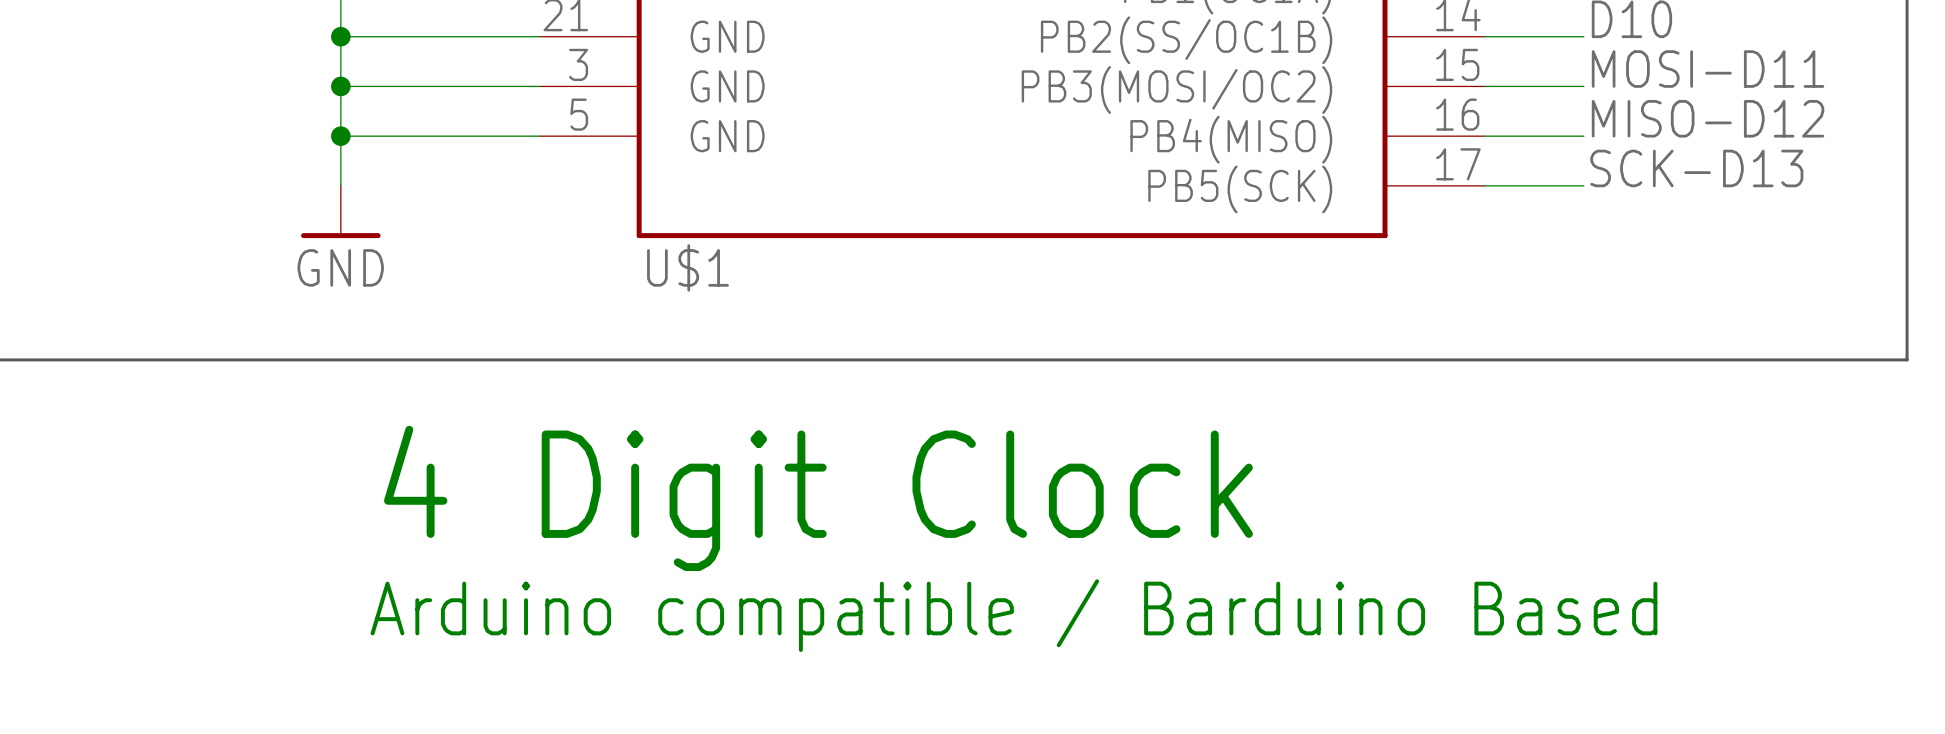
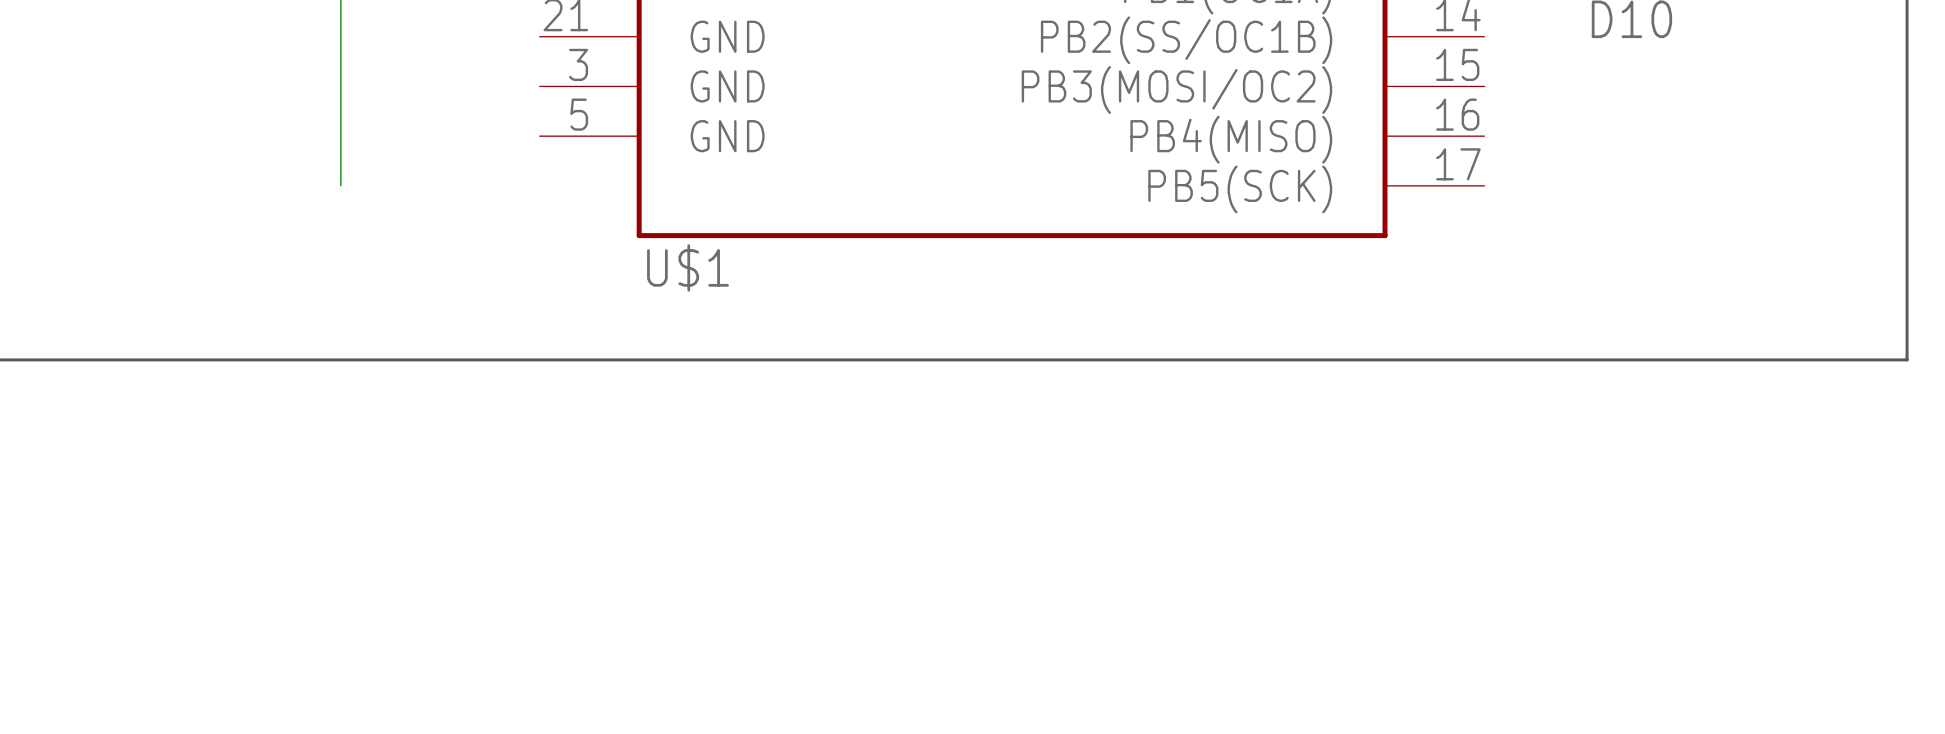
wire: (340, 36) (539, 36) -> none
junction: (340, 36) -> none
wire: (1484, 36) (1583, 36) -> none
label: MOSI-D11 (1708, 69) -> none
wire: (340, 86) (539, 86) -> none
junction: (340, 86) -> none
wire: (1484, 86) (1583, 86) -> none
label: MISO-D12 (1708, 118) -> none
wire: (340, 136) (539, 136) -> none
junction: (340, 136) -> none
wire: (1484, 136) (1583, 136) -> none
label: SCK-D13 (1696, 168) -> none
wire: (1484, 185) (1583, 185) -> none
power symbol: GND (340, 211) -> none
text: 4 Digit Clock (818, 498) -> none
text: Arduino compatible / Barduino Based (1013, 615) -> none

